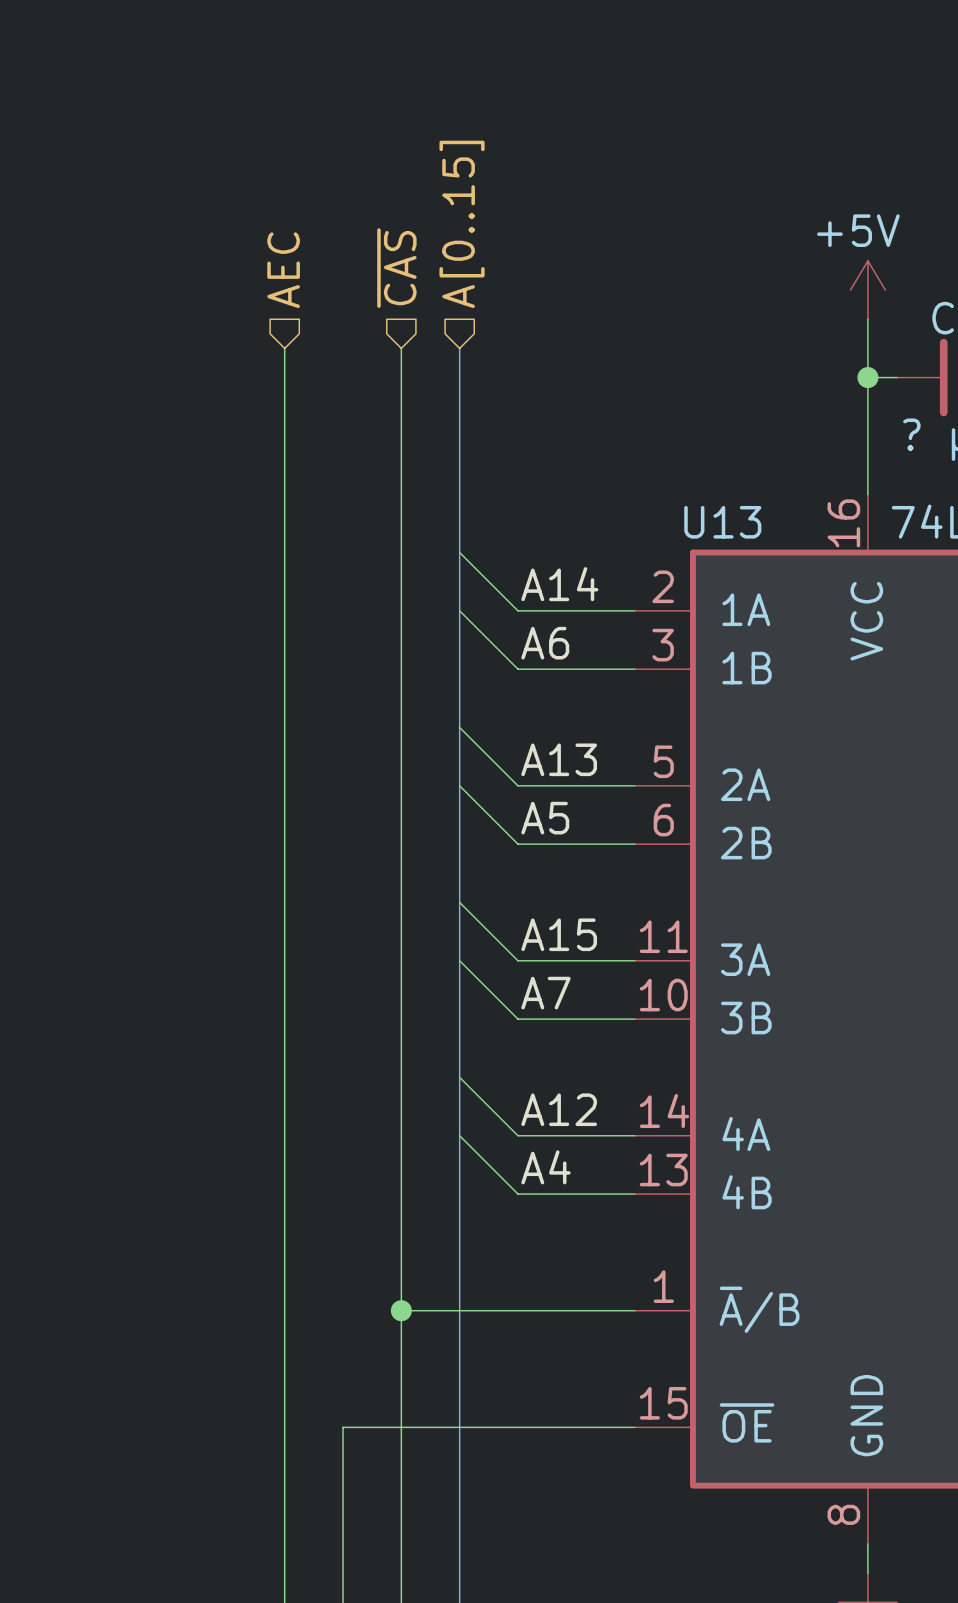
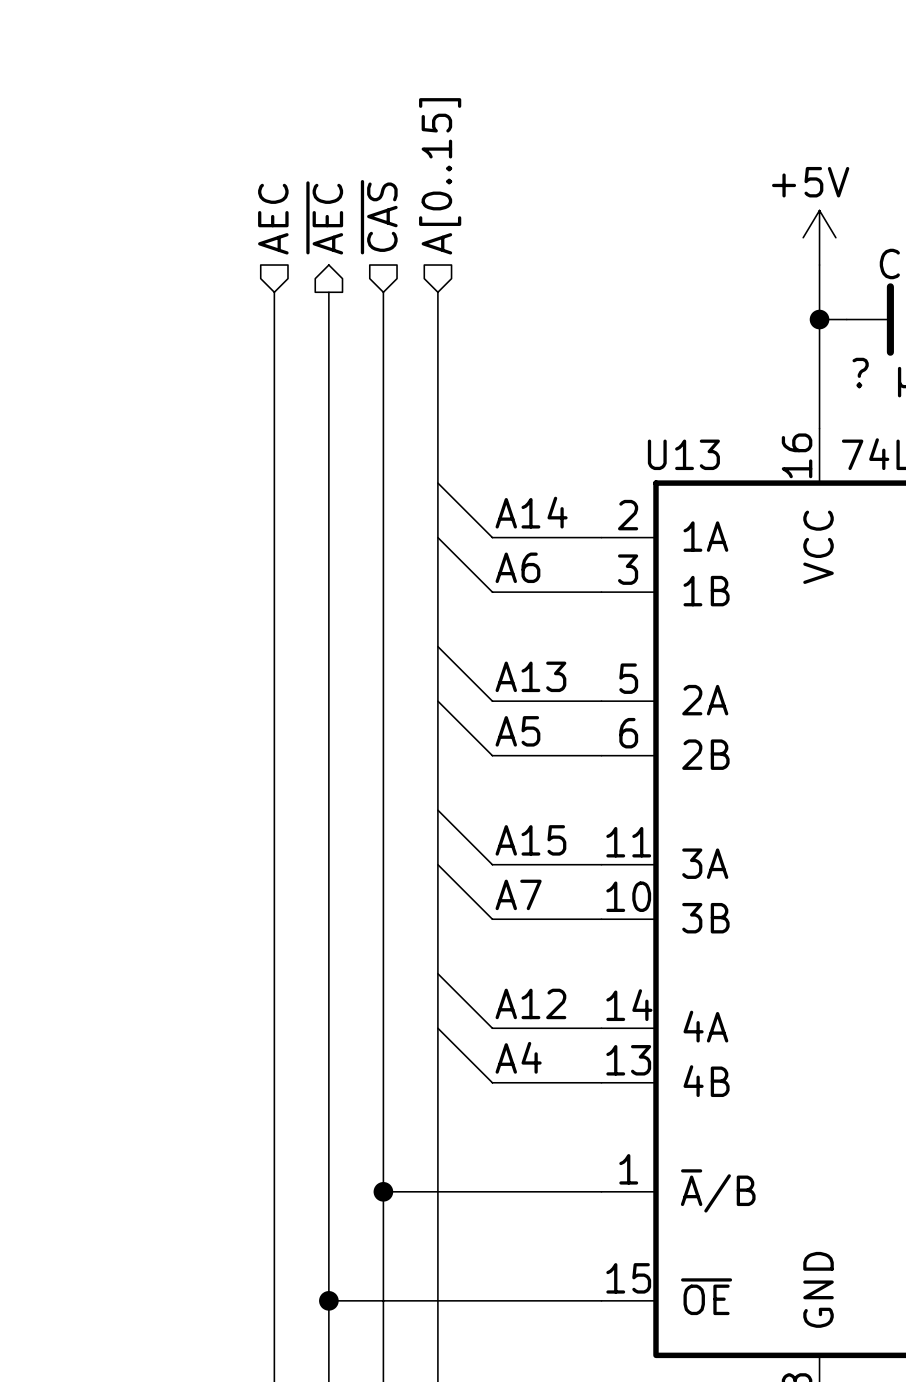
hierarchical label: none -> ~{AEC} (324, 217)
wire: none -> (328, 292) (328, 1300)
junction: none -> (328, 1300)

